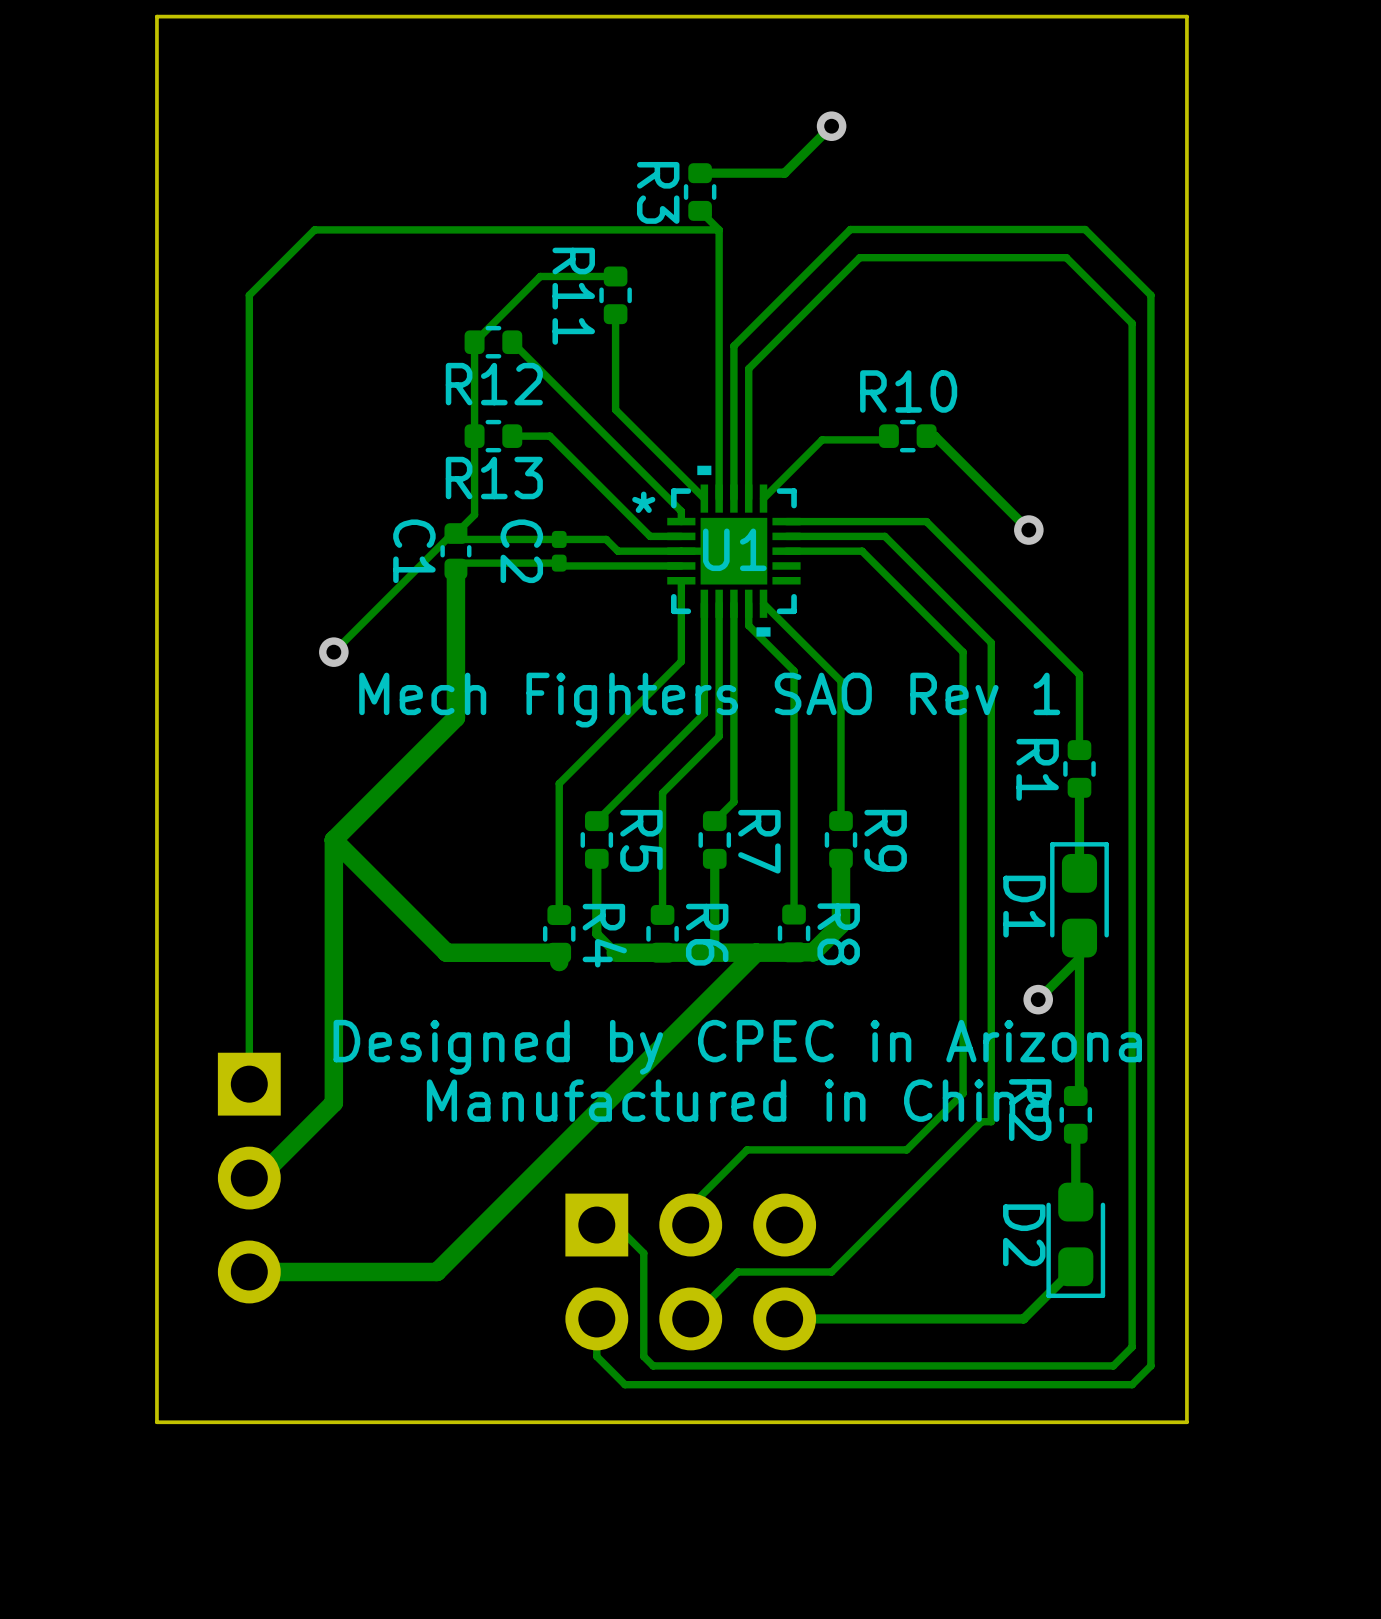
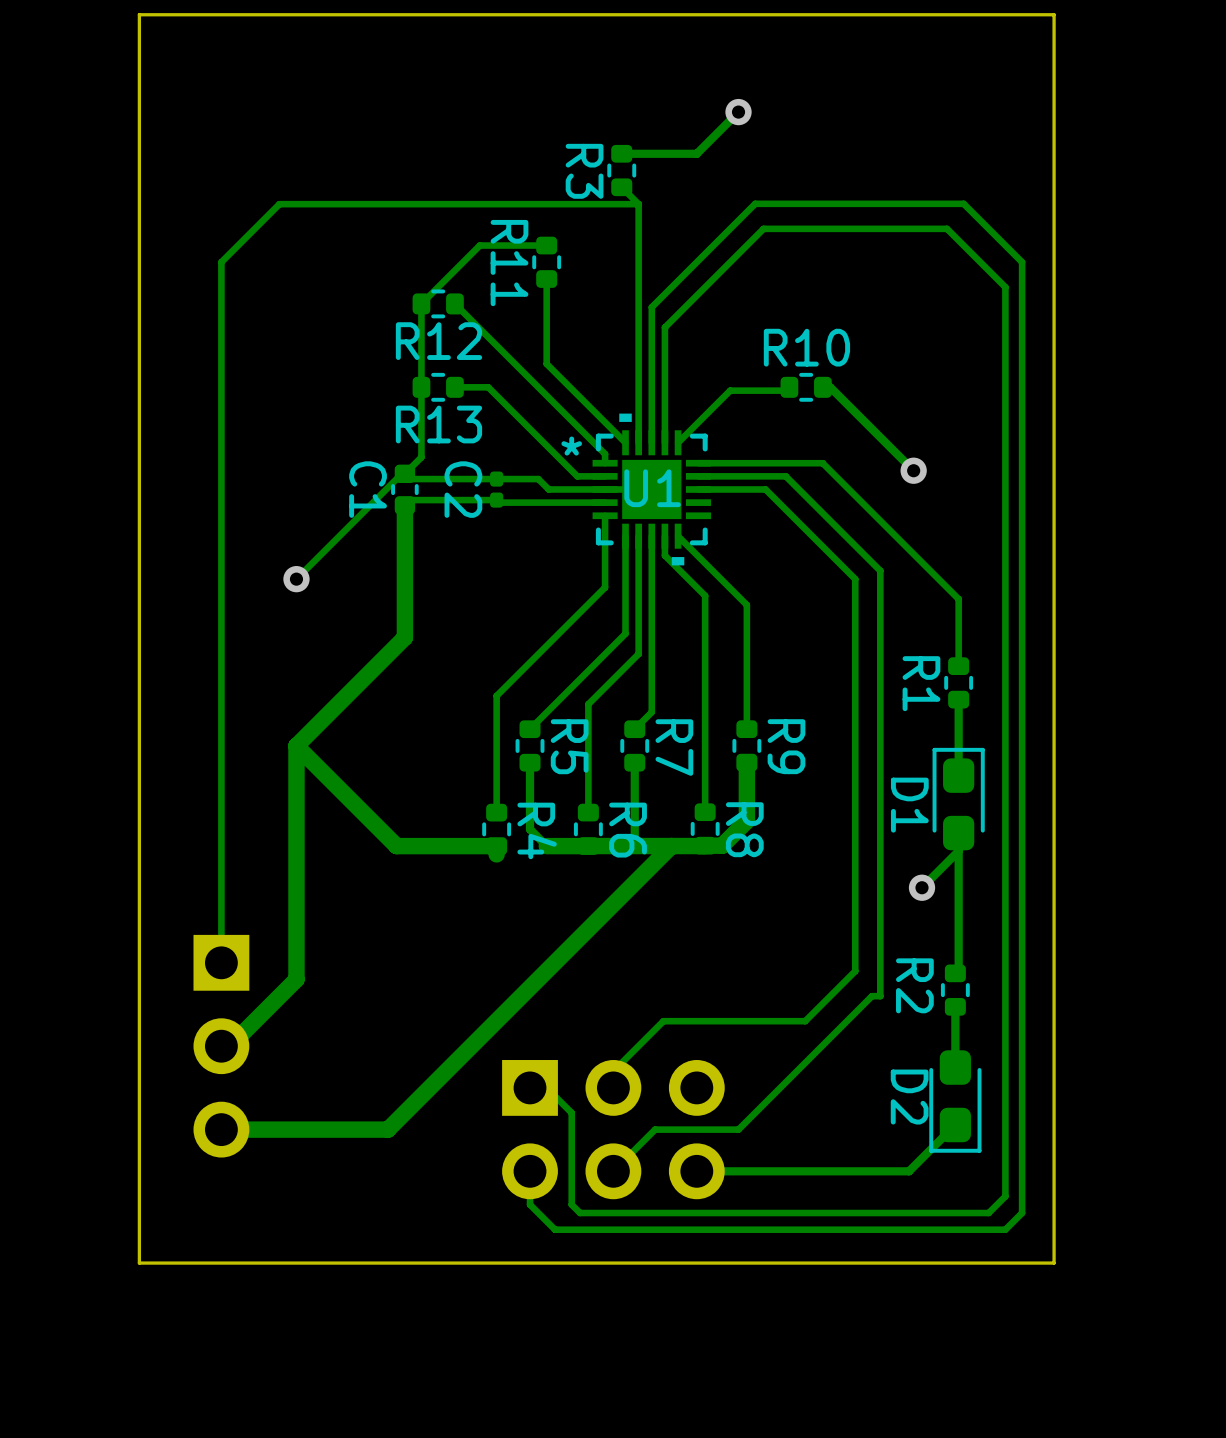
text: Mech Fighters SAO Rev 1 (709, 700) -> none
text: Designed by CPEC in Arizona (737, 1047) -> none
text: Manufactured in China (737, 1100) -> none

